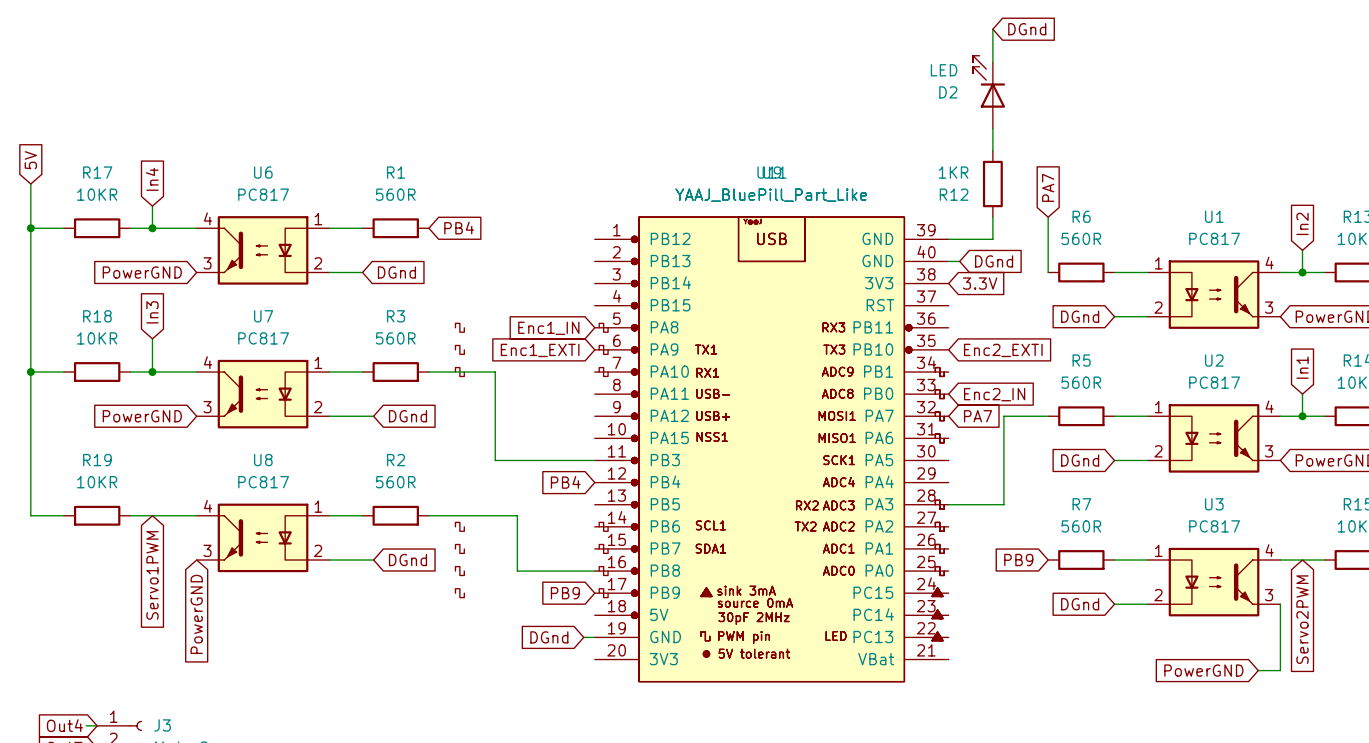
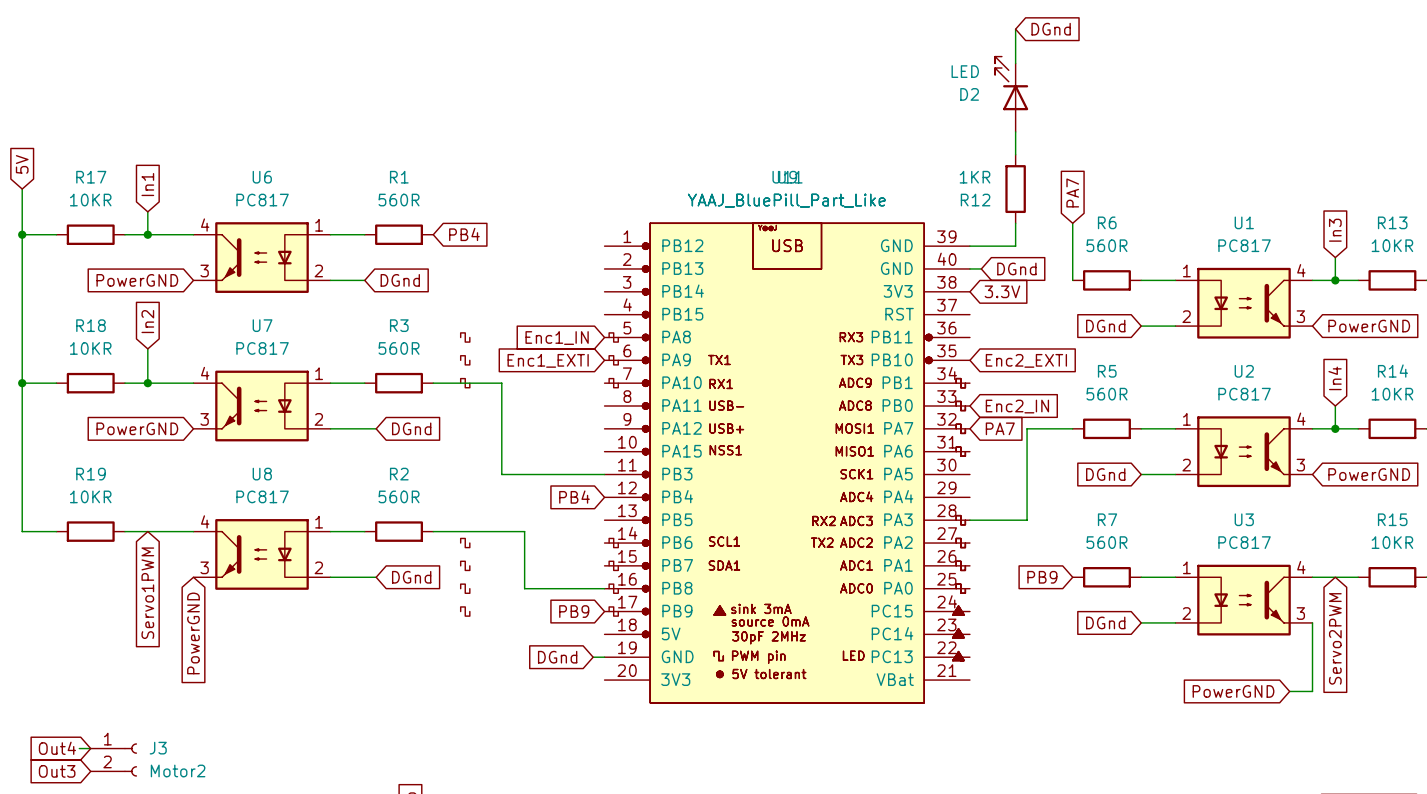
global label: In4 (152, 179) -> In1 (147, 184)
global label: In2 (1302, 223) -> In3 (1335, 230)
global label: In3 (152, 312) -> In2 (147, 321)
global label: In1 (1302, 367) -> In4 (1335, 378)

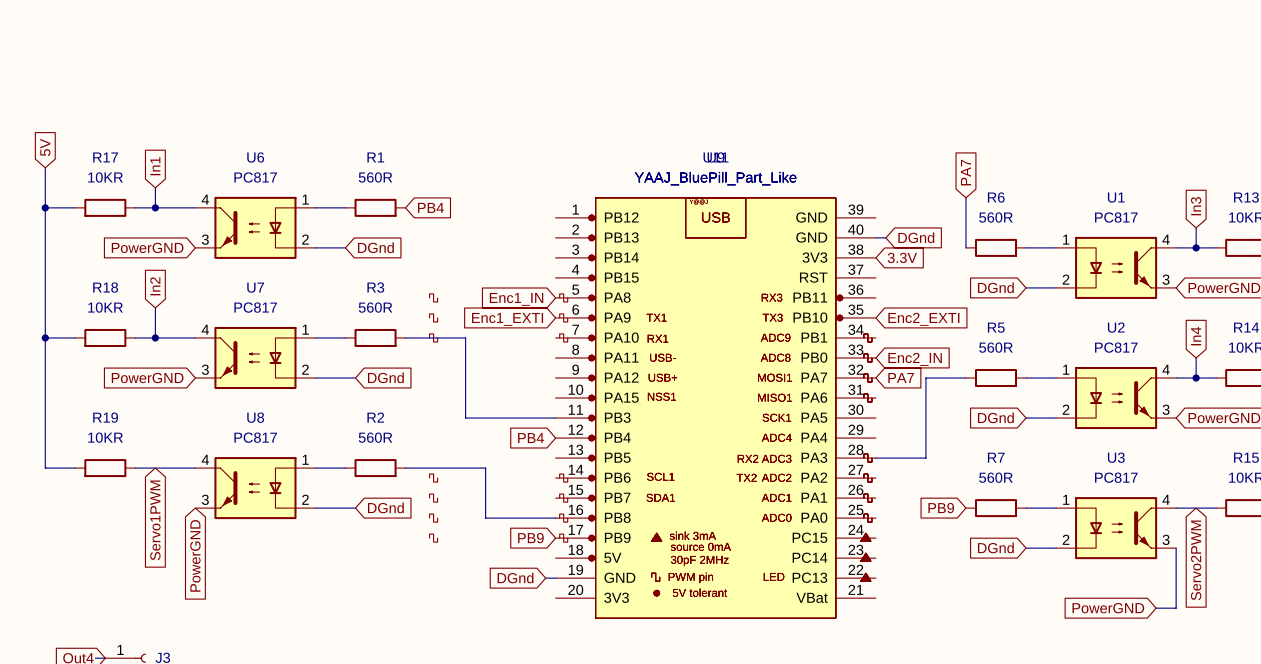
wire: (1015, 29) (1015, 63) -> none
global label: DGnd (1051, 29) -> none
D2: LED (1011, 94) -> none
wire: (1015, 131) (1015, 154) -> none
R12: 1KR (1015, 189) -> none
wire: (1015, 223) (1015, 246) (969, 246) -> none

